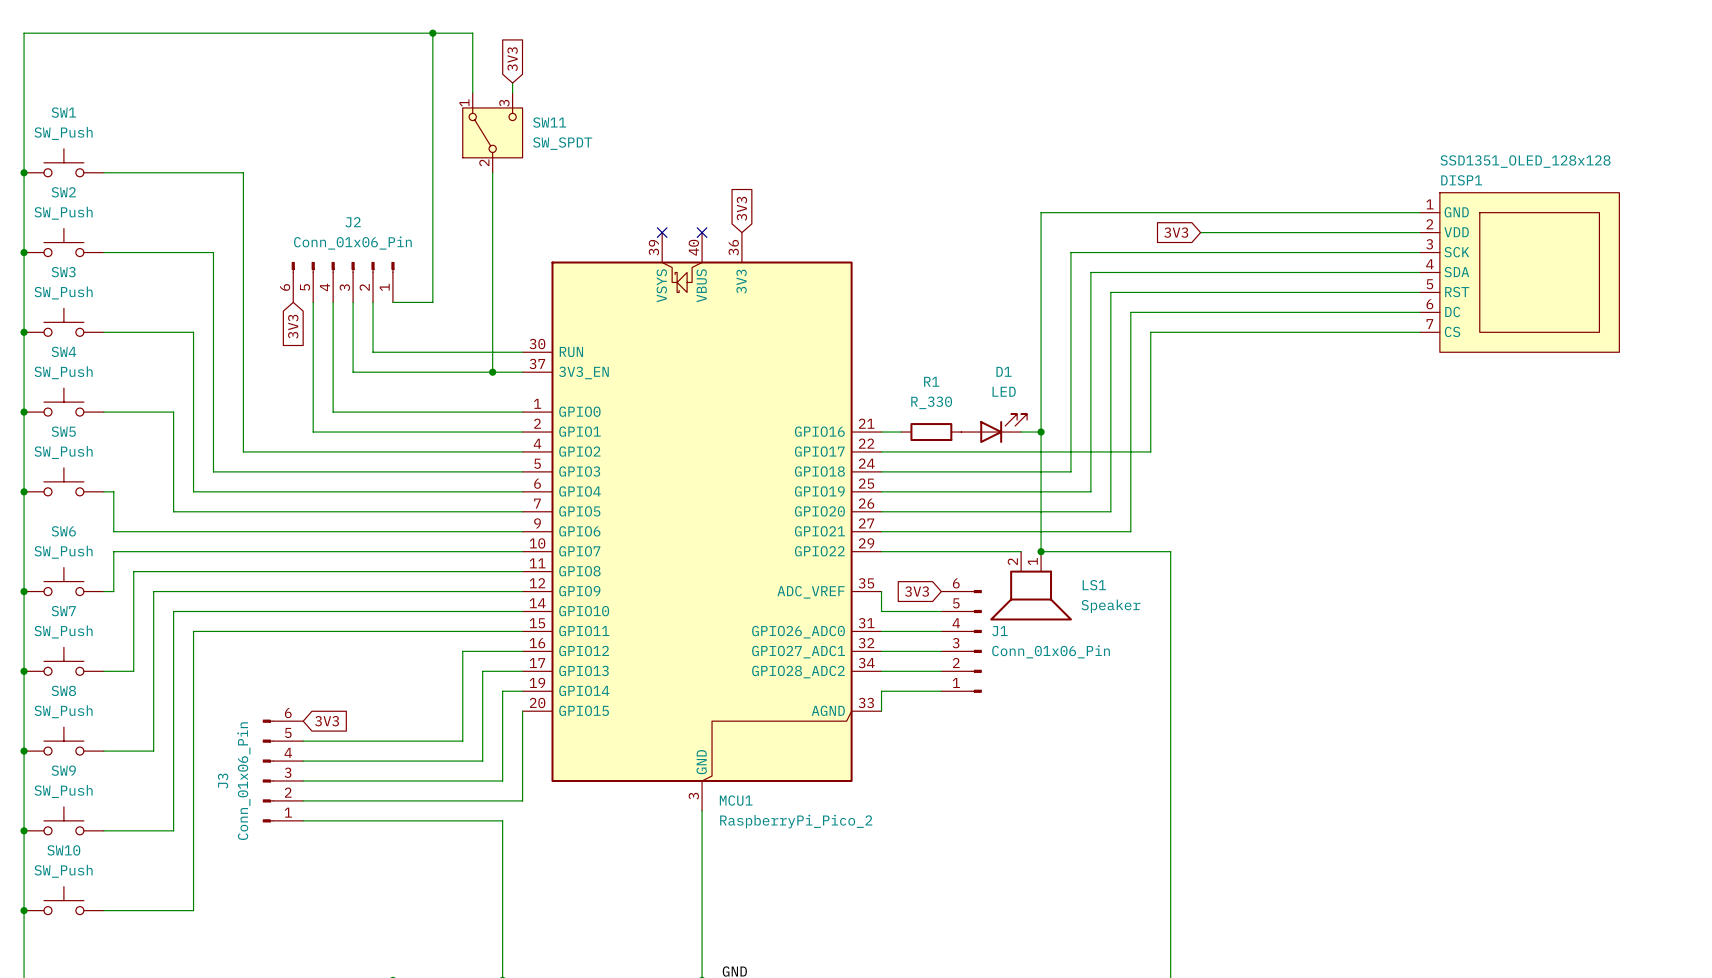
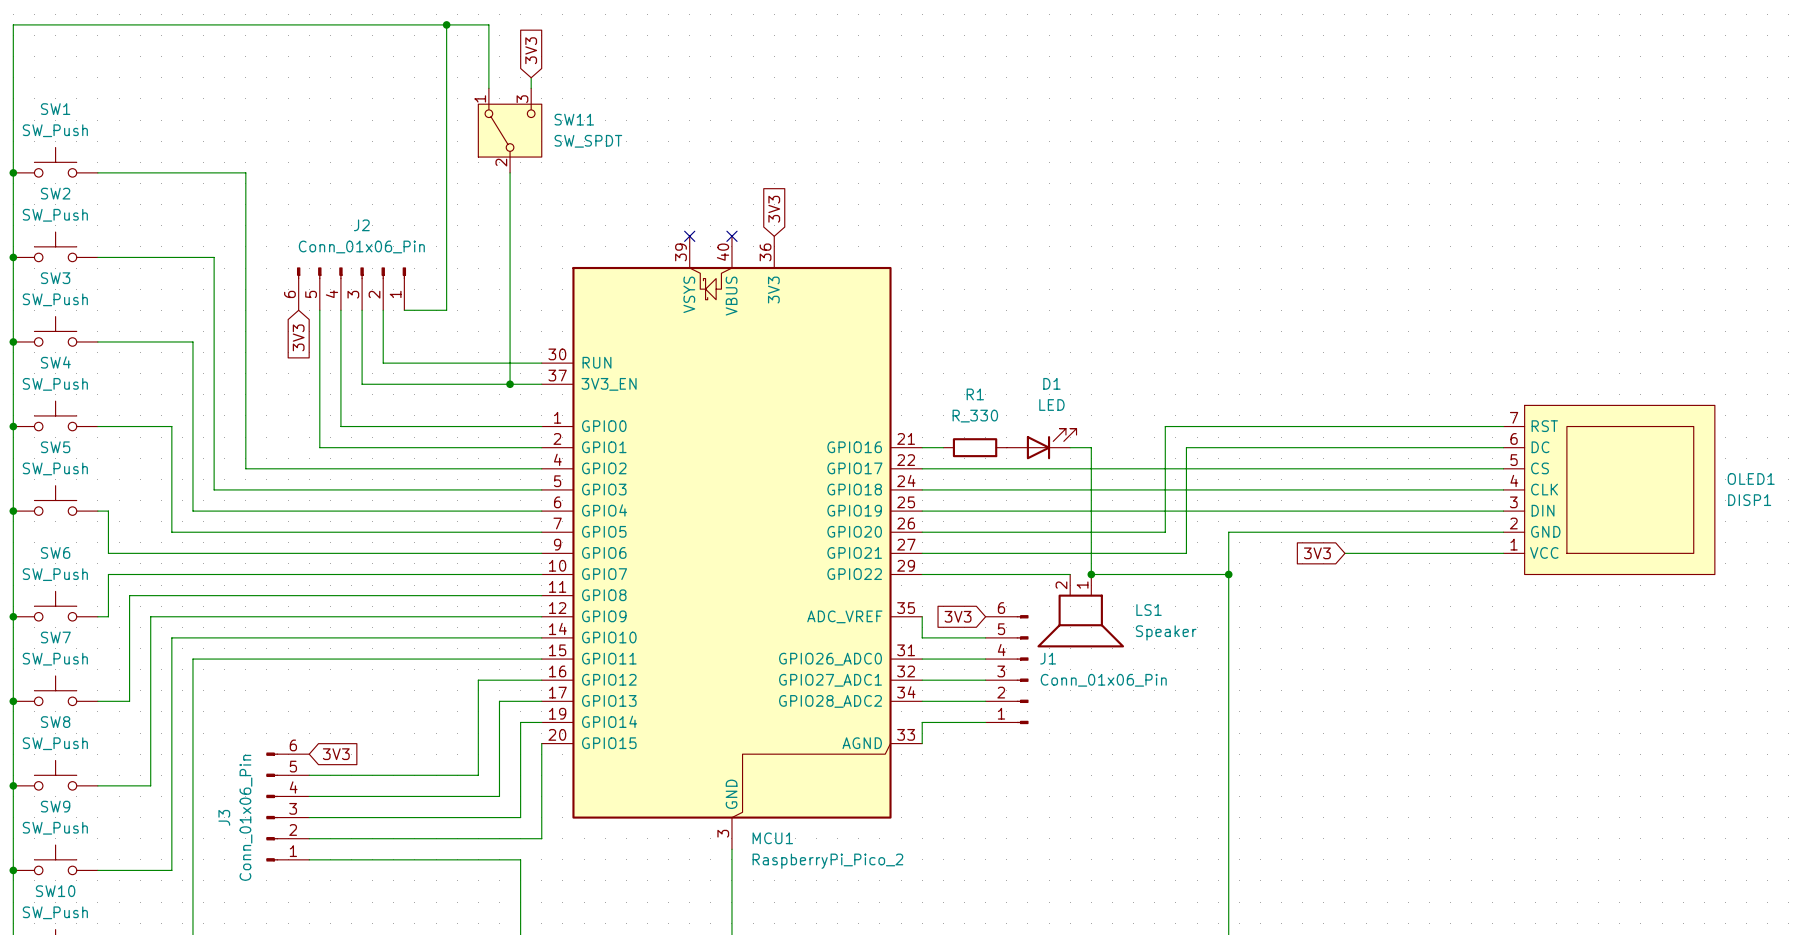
wire: (1419, 212) (1041, 212) (1041, 432) -> none
global label: 3V3 (1176, 232) -> none
wire: (1200, 232) (1419, 232) -> none
wire: (1419, 252) (1070, 252) (1070, 471) -> (1503, 489) (1123, 489)
wire: (1419, 272) (1090, 272) (1090, 491) -> (1503, 511) (1144, 511)
DISP1: SSD1351_OLED_128x128 (1519, 272) -> none
wire: (1419, 292) (1110, 292) (1110, 412) -> (1503, 426) (1165, 426)
wire: (1419, 312) (1130, 312) (1130, 432) -> (1503, 447) (1186, 447)
wire: (1419, 332) (1150, 332) (1150, 451) -> (1503, 468) (1207, 468)
junction: (1041, 432) -> none
OLED1: none -> DISP1 (1609, 489)
wire: none -> (1503, 532) (1228, 532) (1228, 574)
global label: none -> 3V3 (1317, 553)
wire: none -> (1344, 553) (1503, 553)
junction: none -> (1228, 574)

